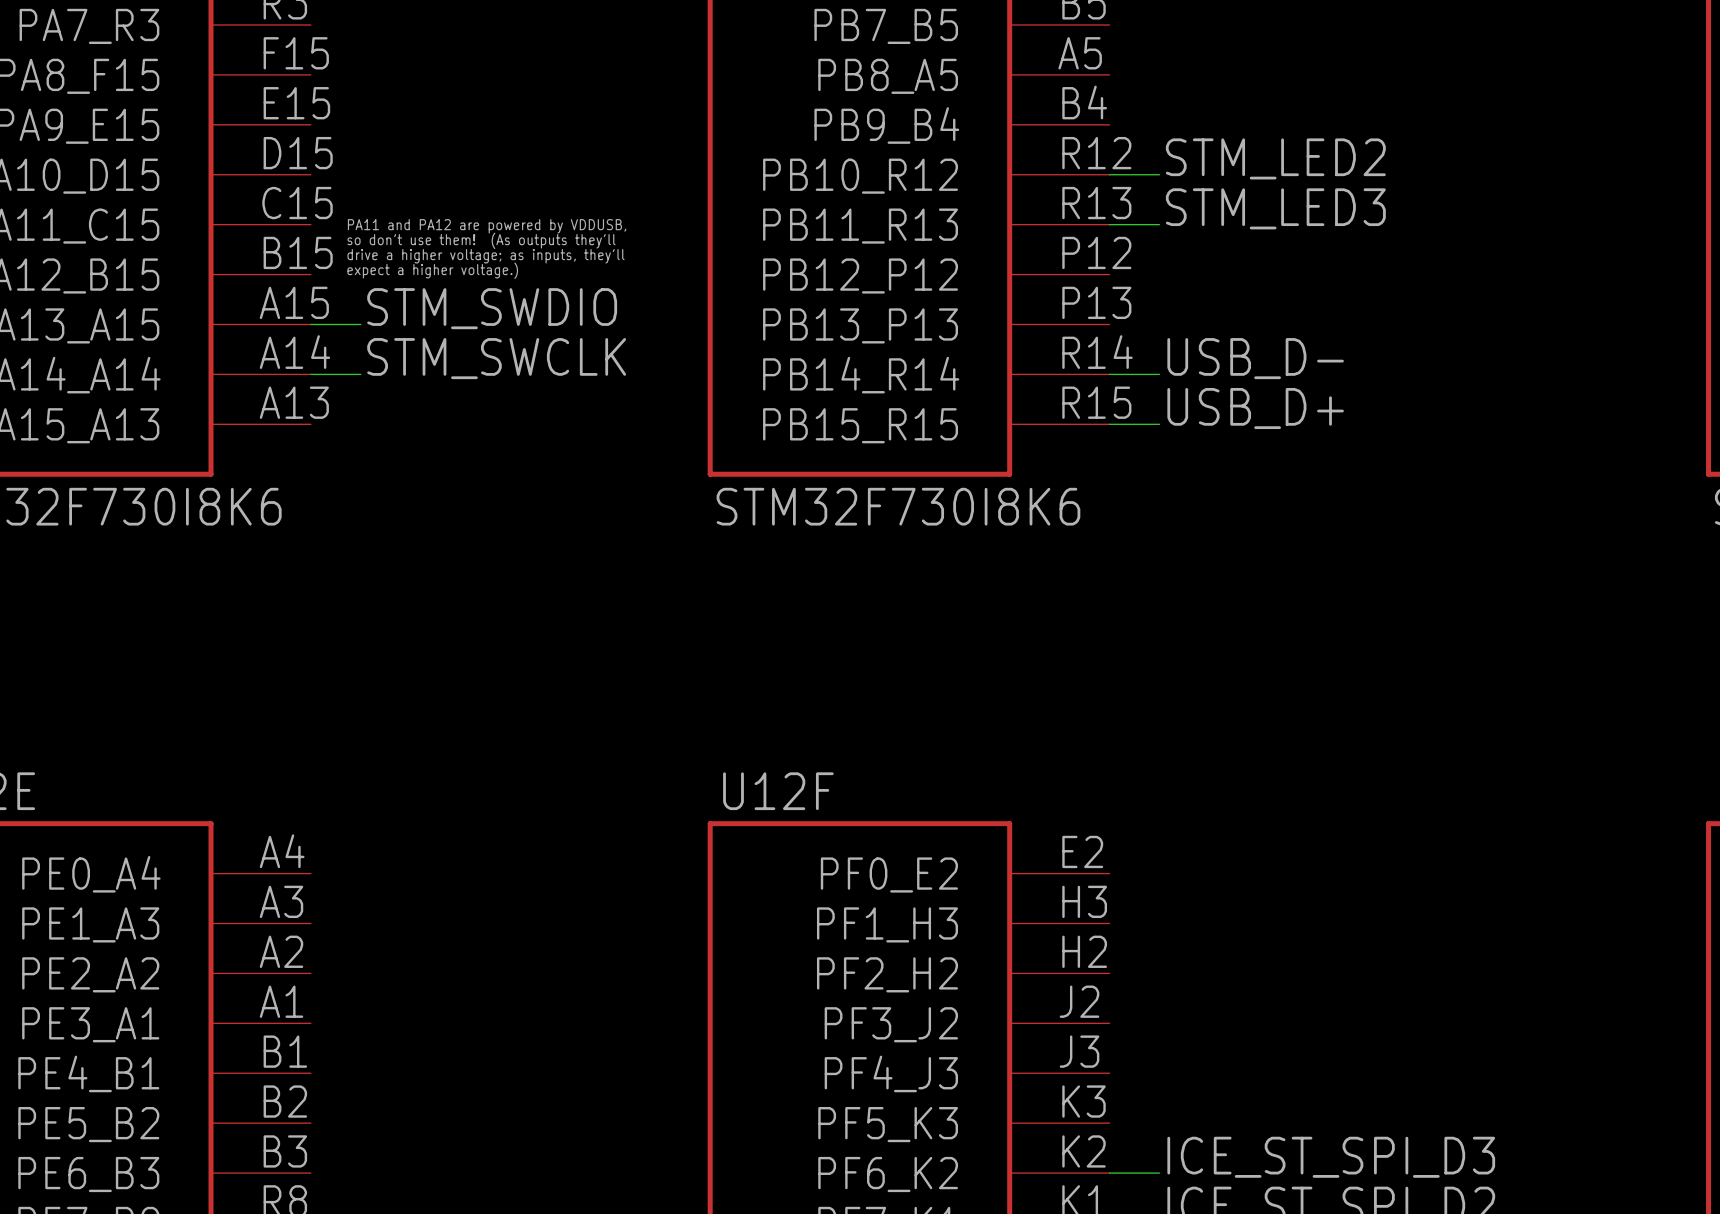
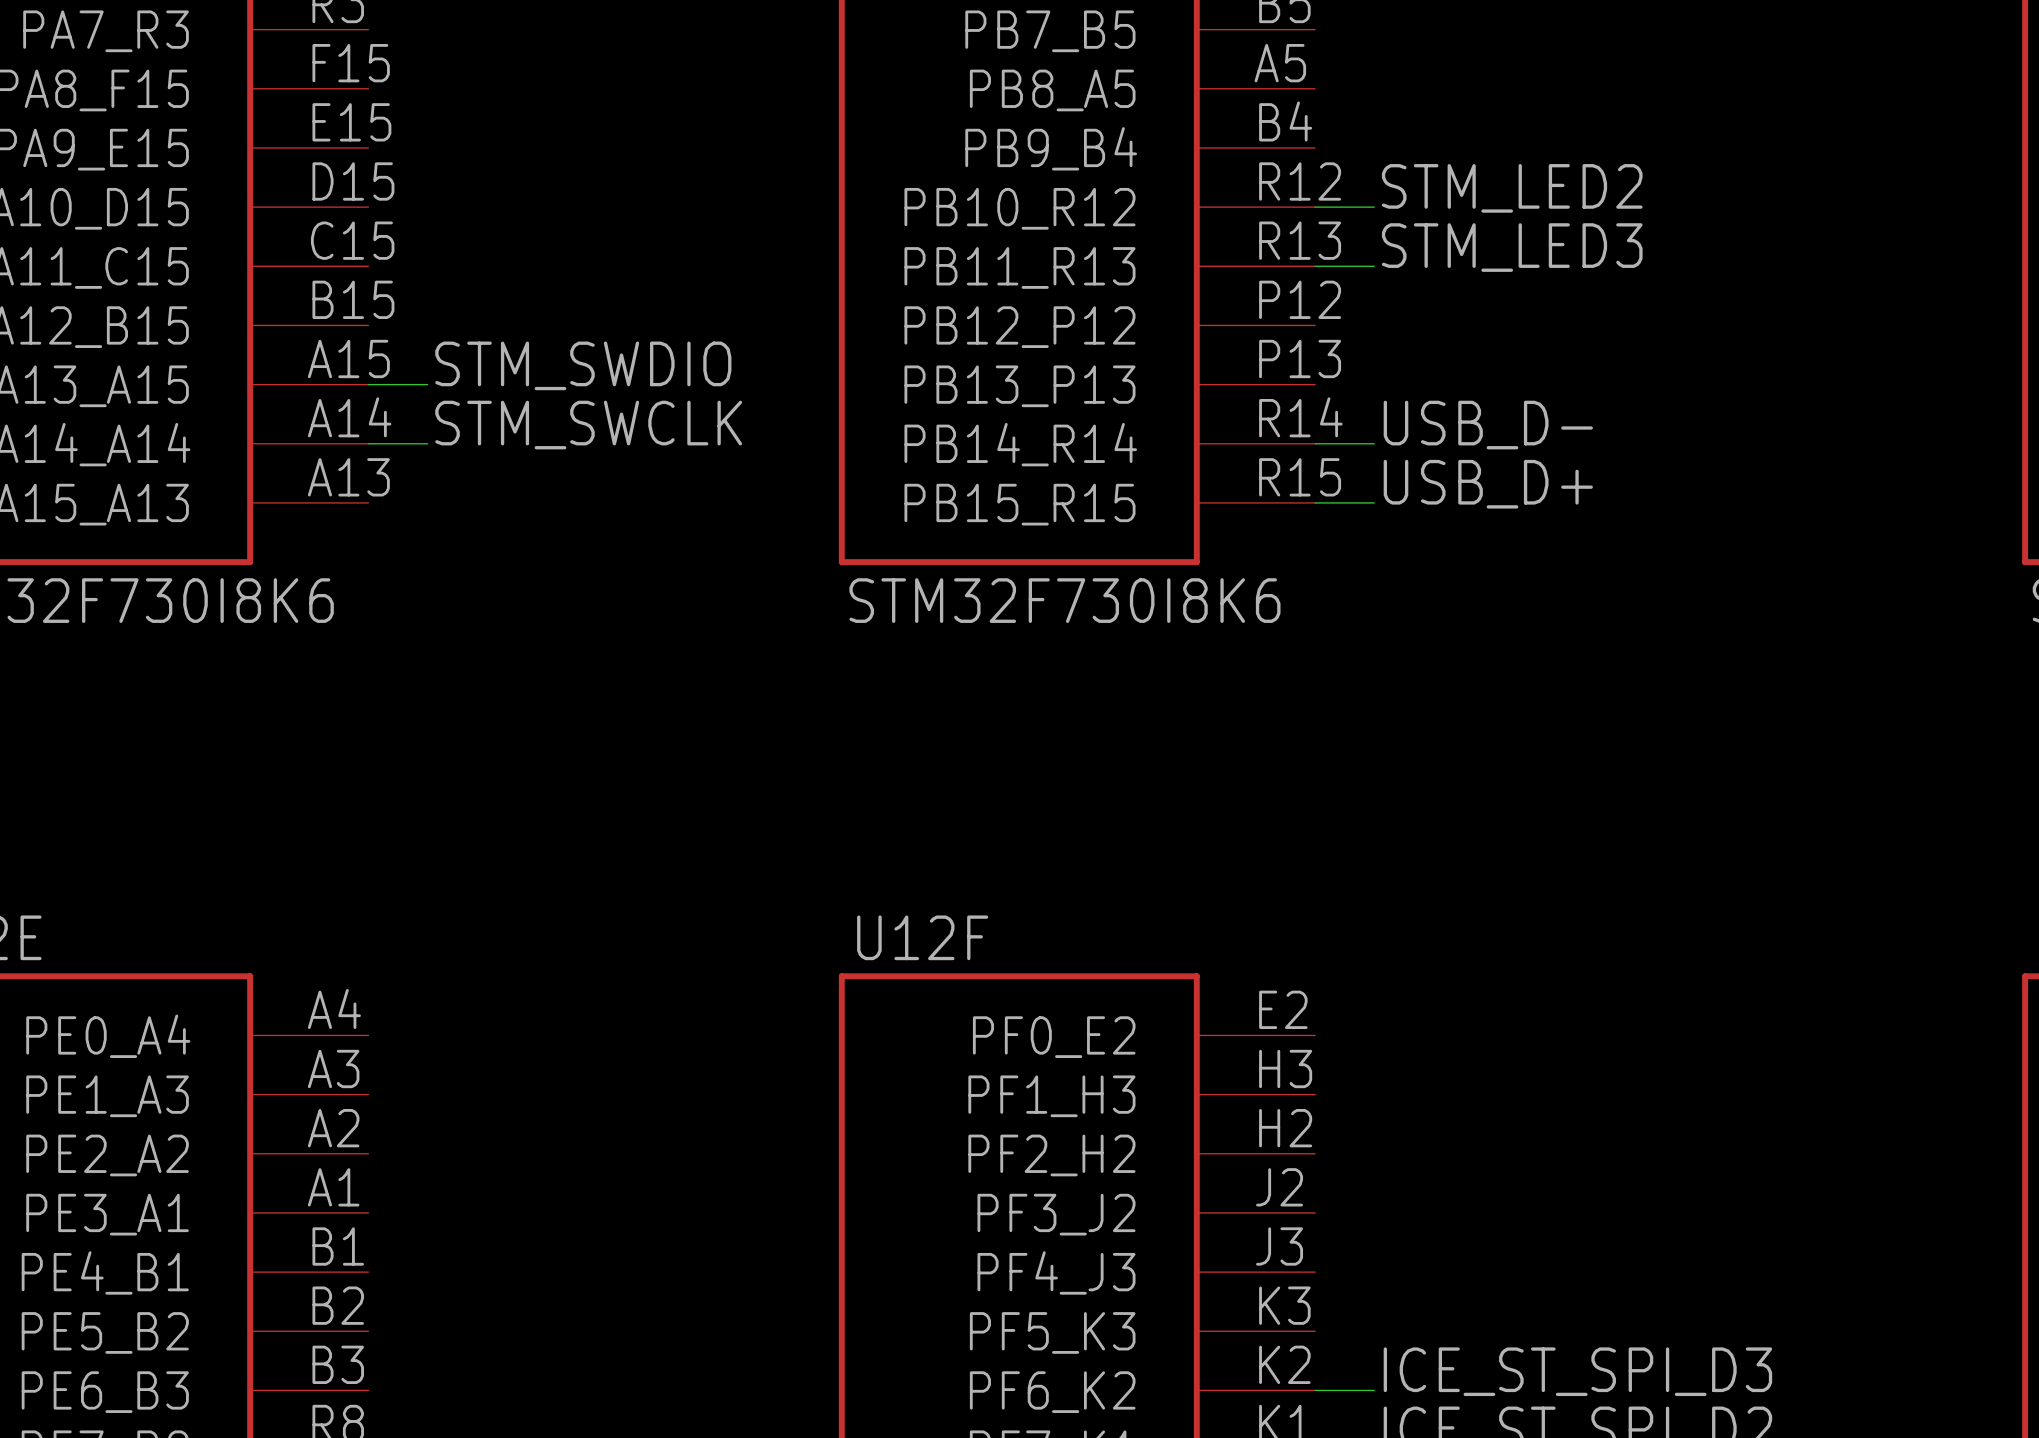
text: PA11 and PA12 are powered by VDDUSB, (487, 226) -> none
text: so don't use them! (As outputs they'll (481, 240) -> none
text: drive a higher voltage; as inputs, they'll (486, 256) -> none
text: expect a higher voltage.) (432, 270) -> none

